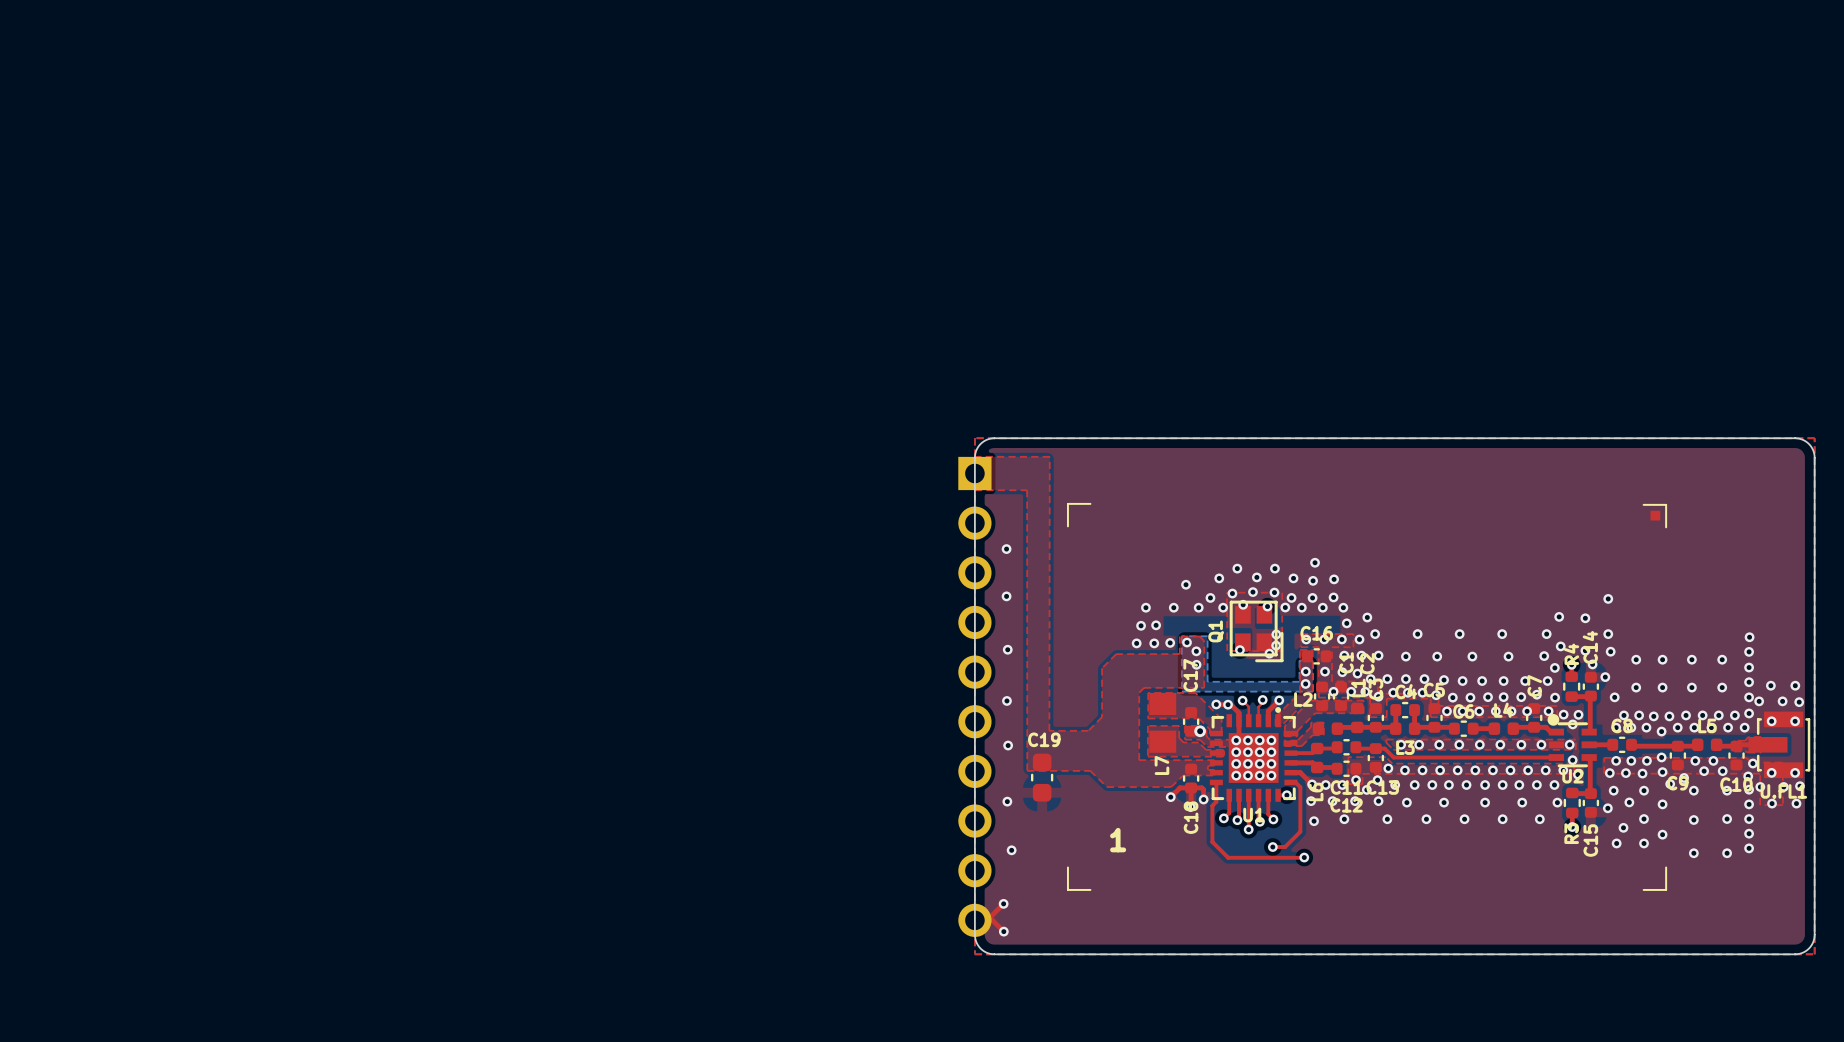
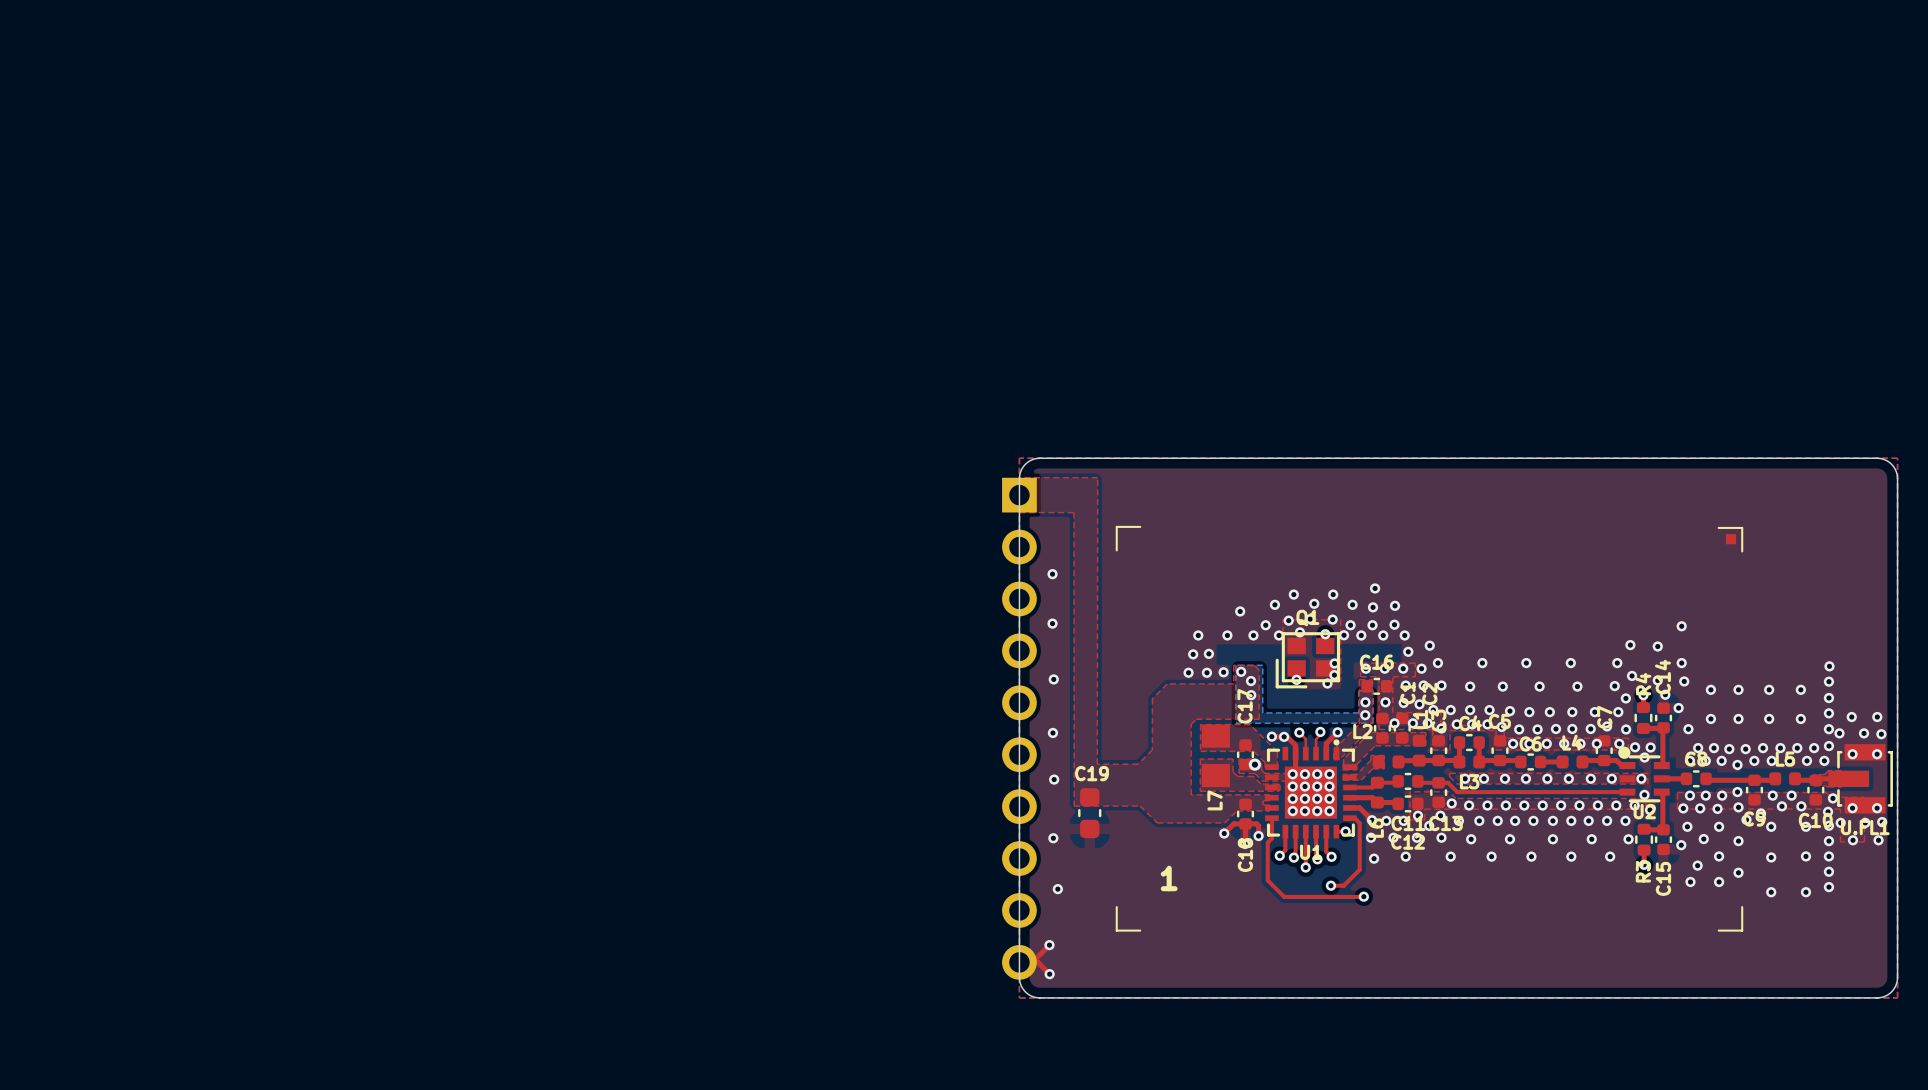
Q1 rotation: 0° (1256, 631) -> 90° clockwise (1307, 660)

